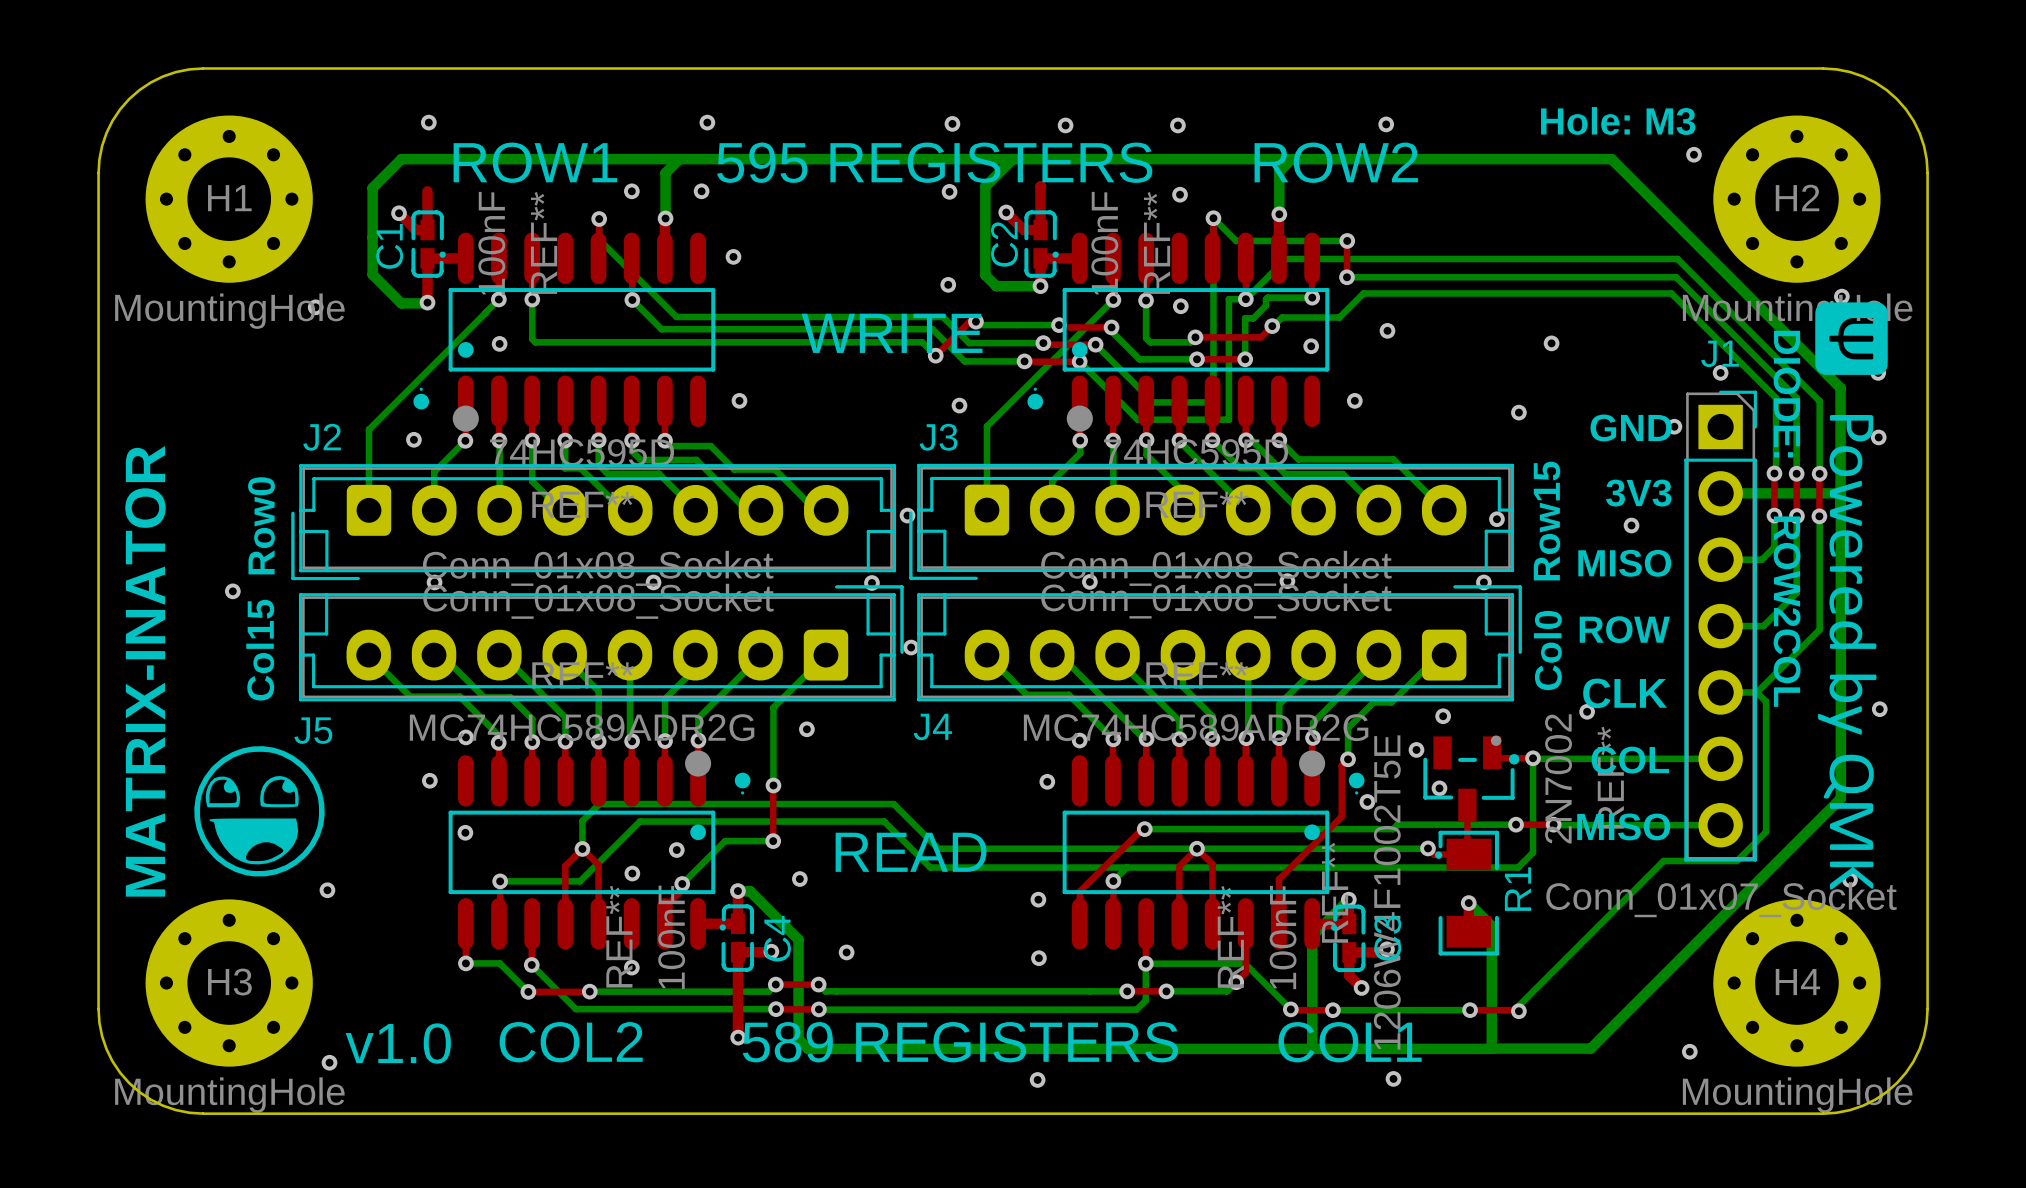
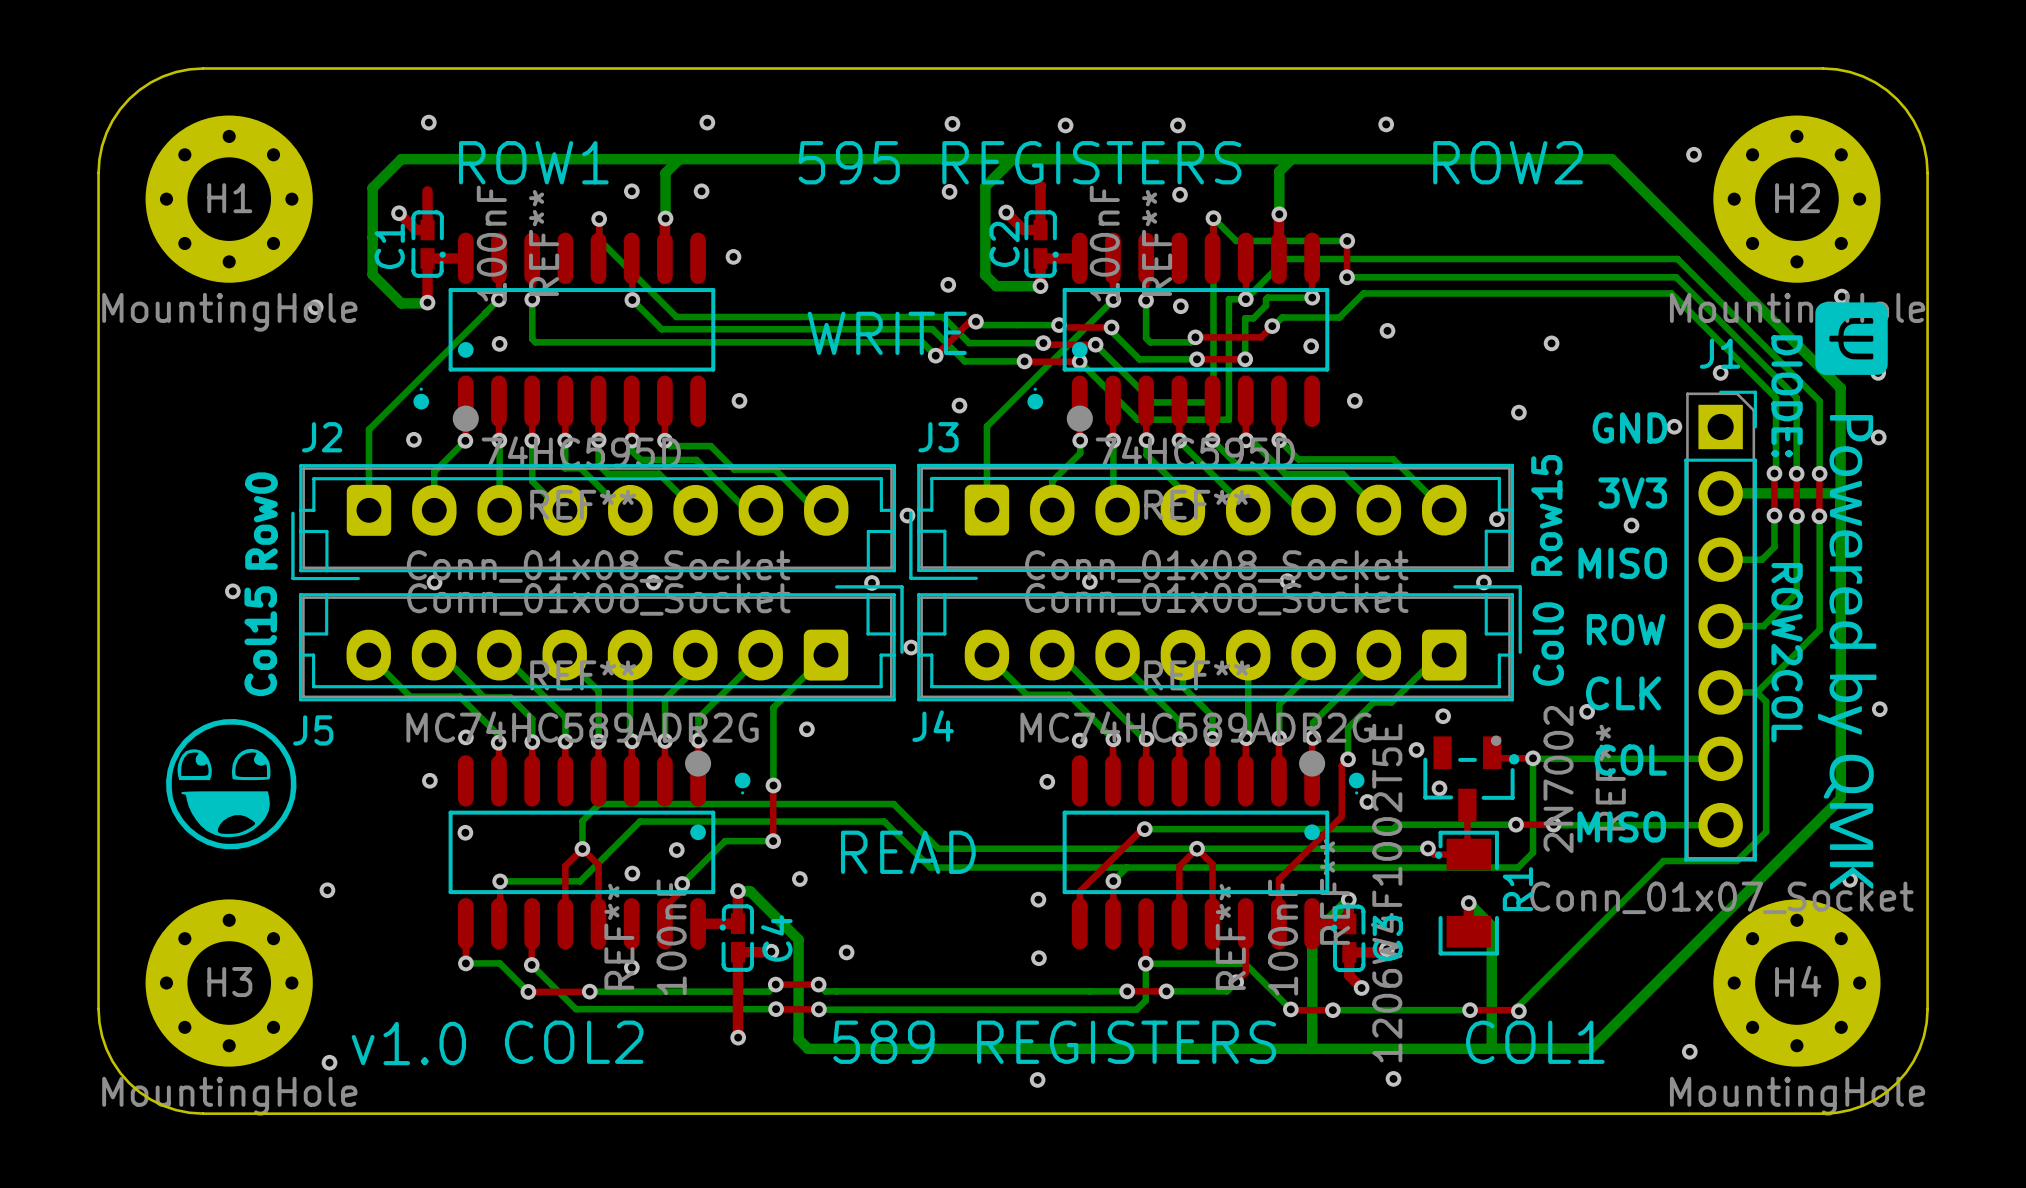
text: Hole: M3 (1618, 120) -> none
text: MATRIX-INATOR (145, 671) -> none
drawing position: (259, 811) -> (231, 784)

